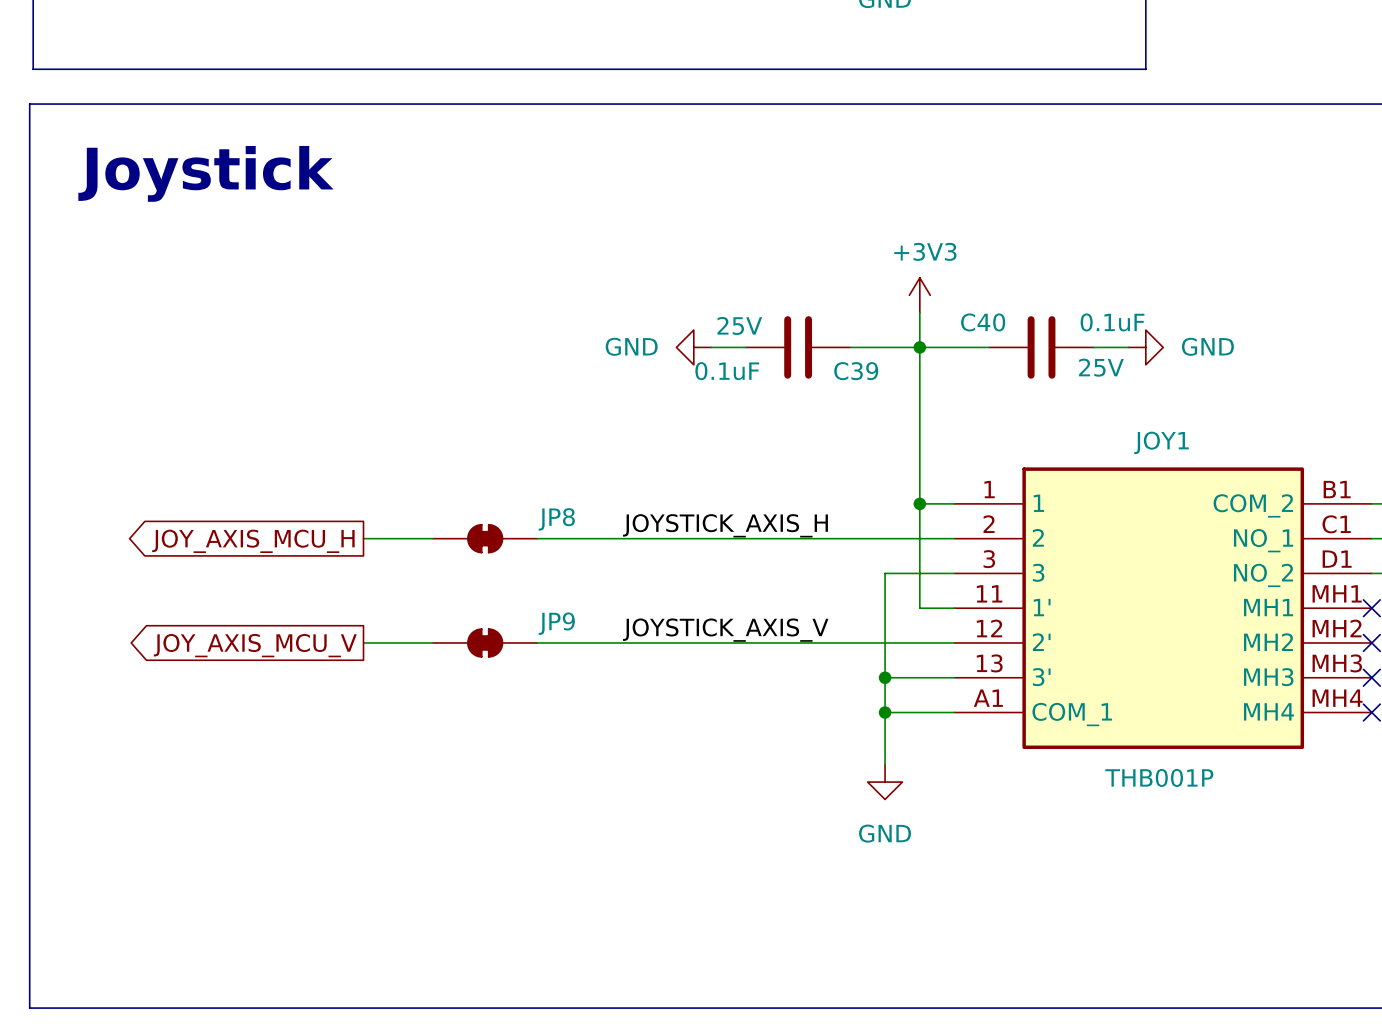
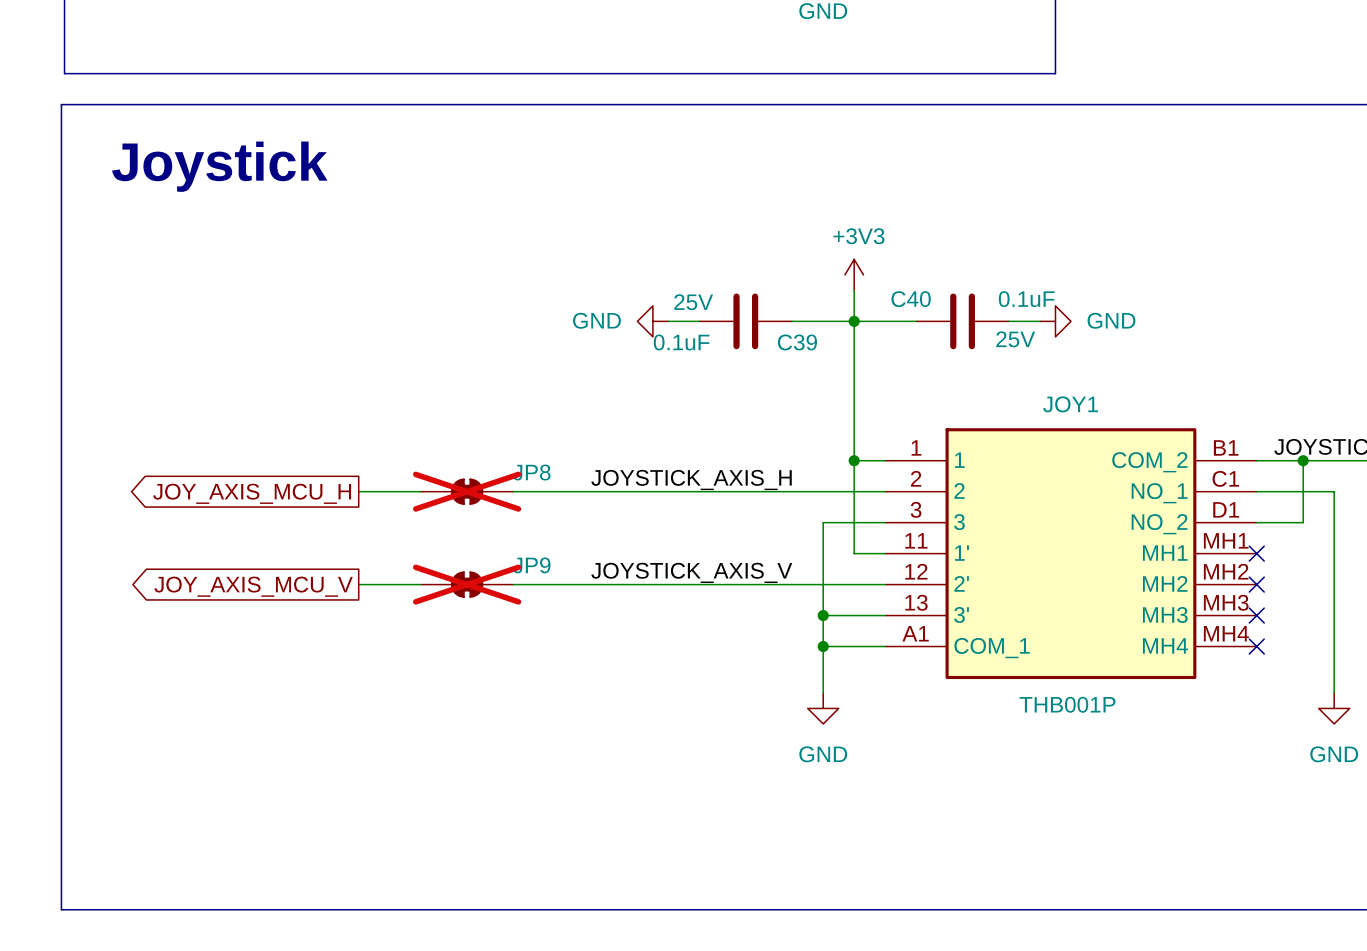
JP8 do-not-place cross: none -> (467, 491)
JP9 do-not-place cross: none -> (467, 584)

